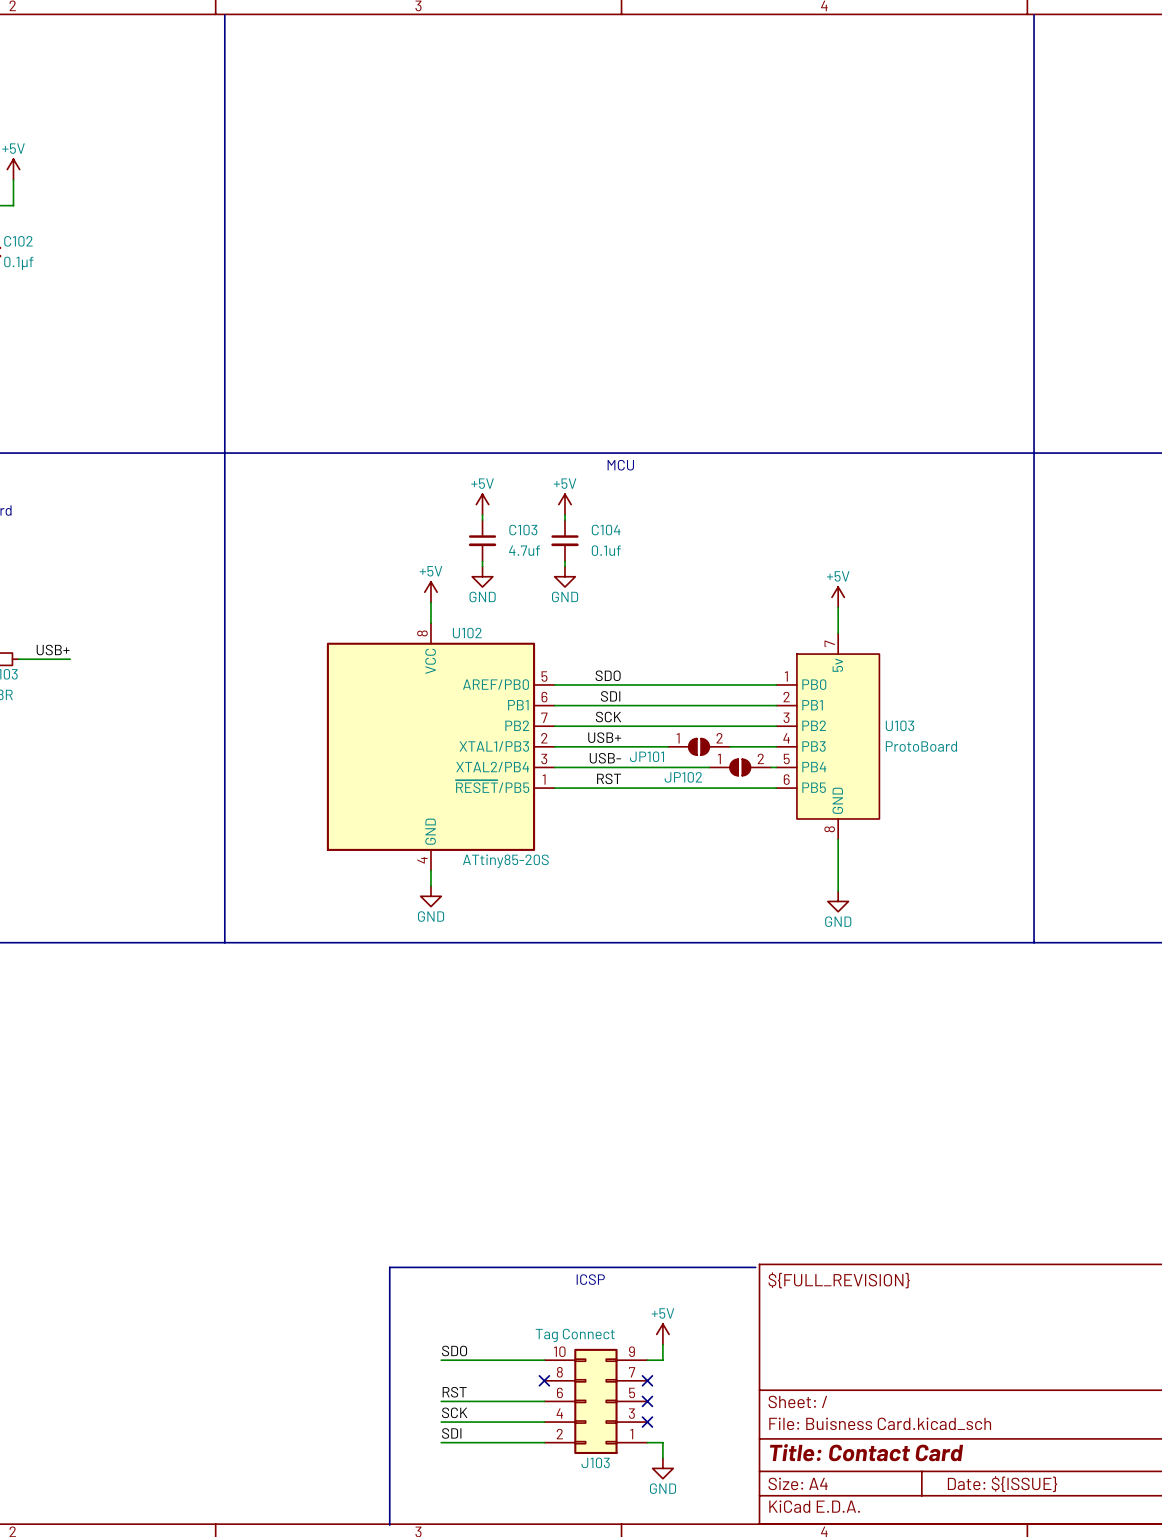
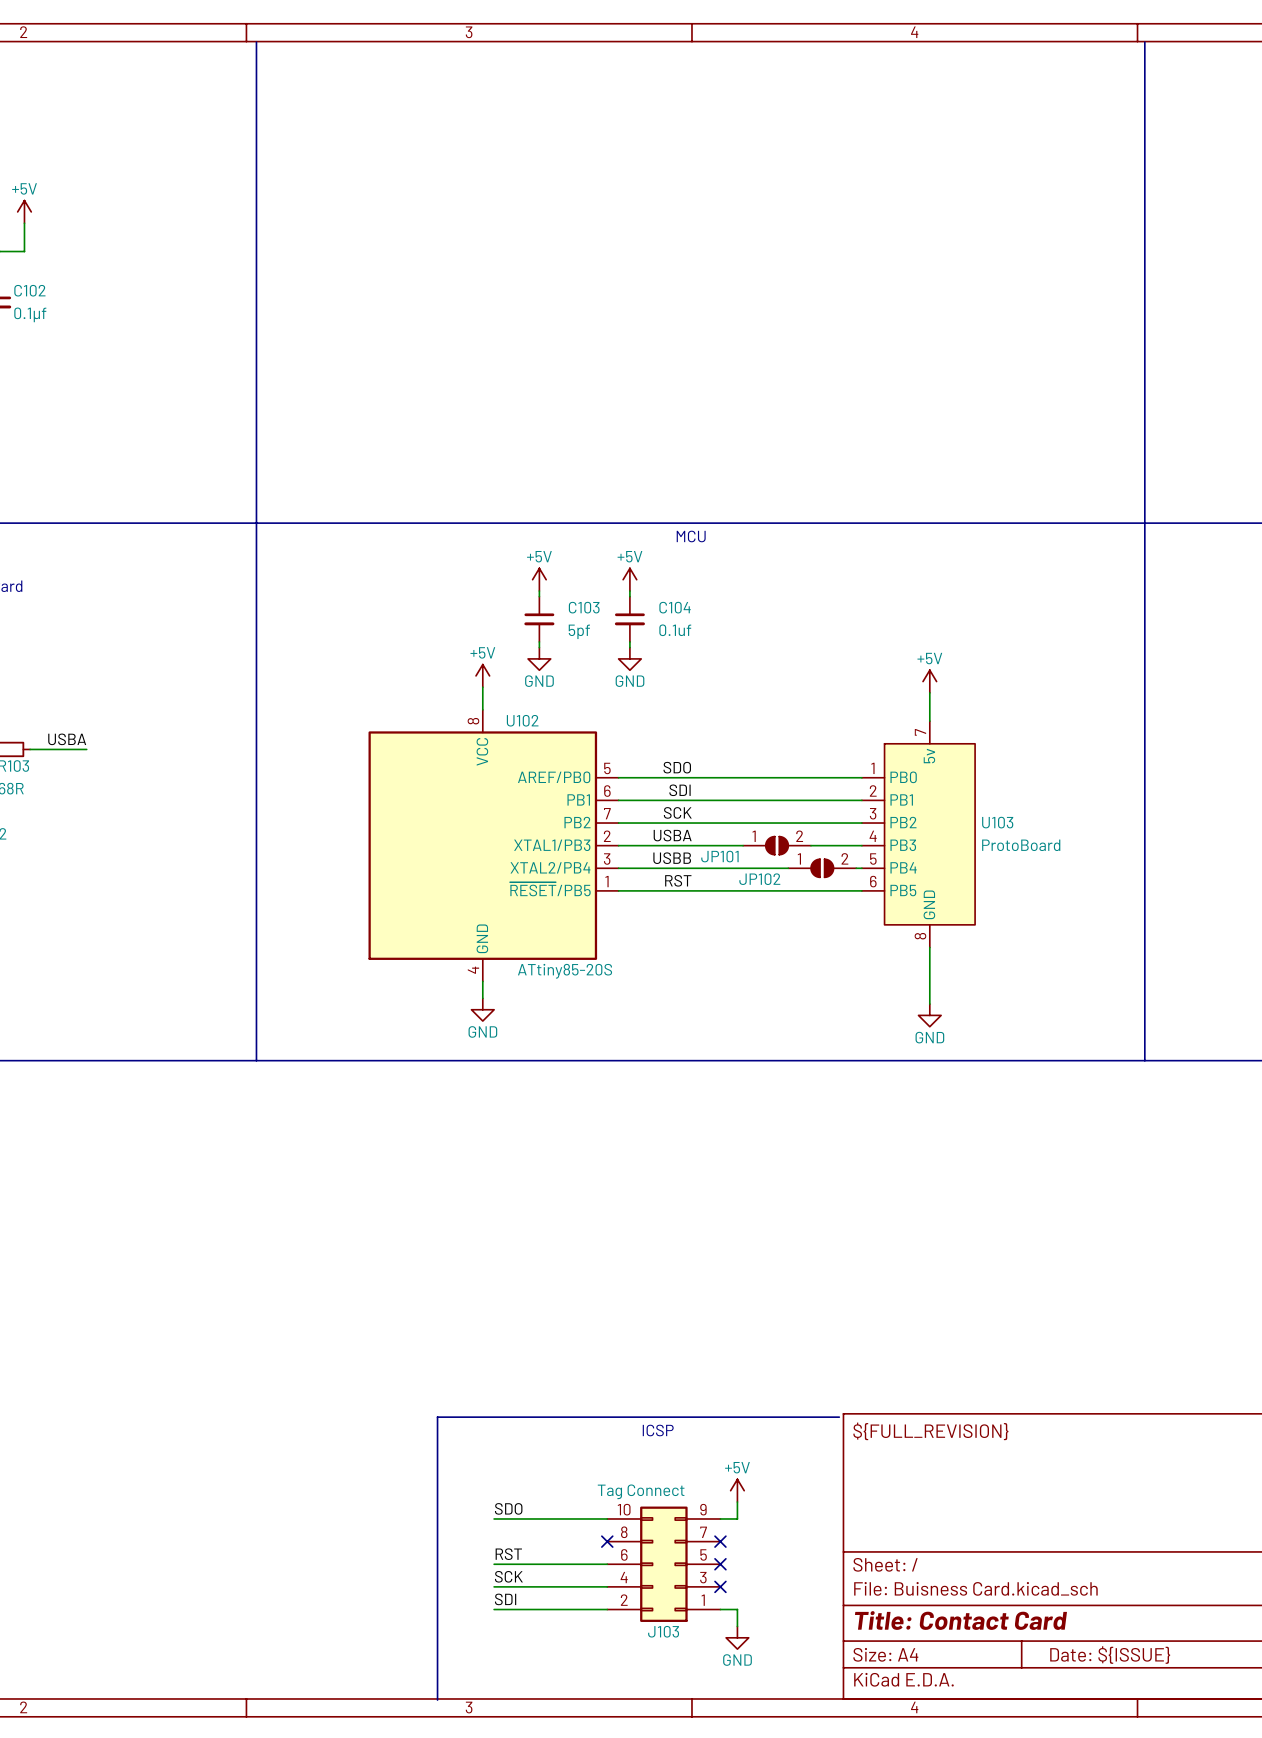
C103 value: 4.7uf (524, 550) -> 5pf (579, 631)
label: USB+ (53, 650) -> USBA (67, 739)
label: USB+ (604, 737) -> USBA (672, 835)
label: USB- (605, 758) -> USBB (672, 858)

